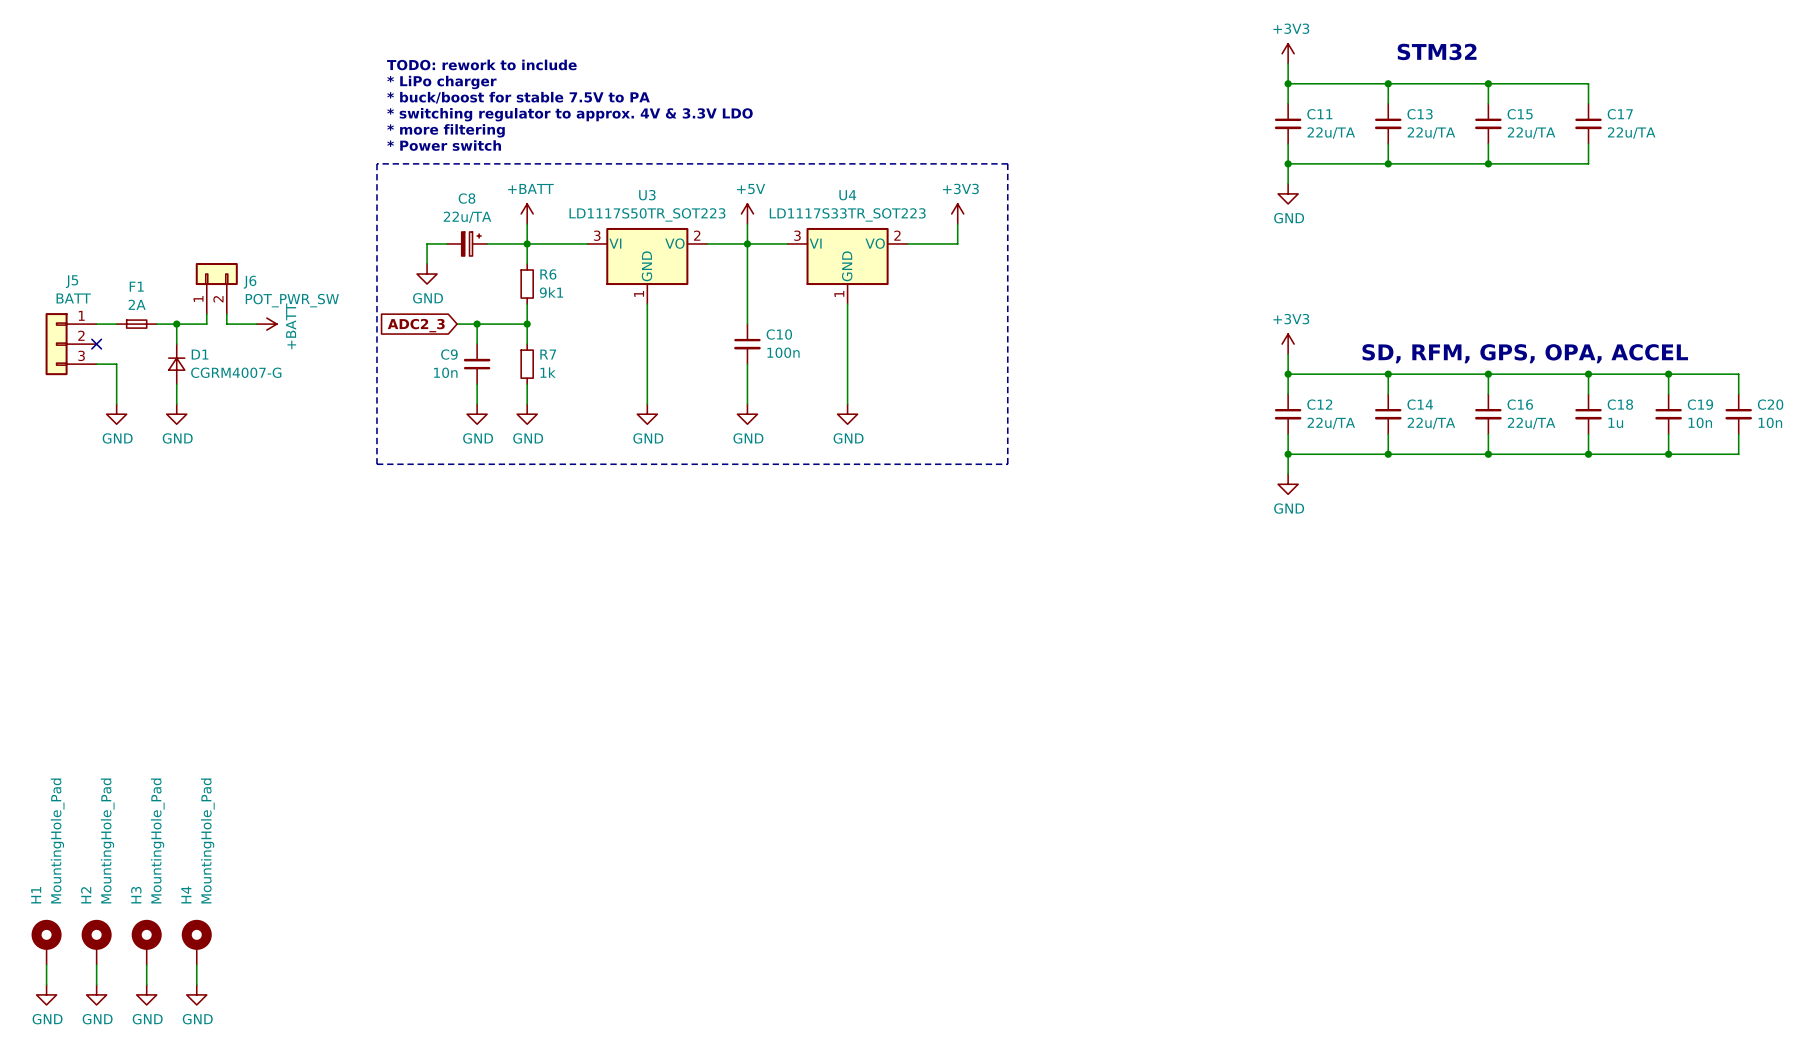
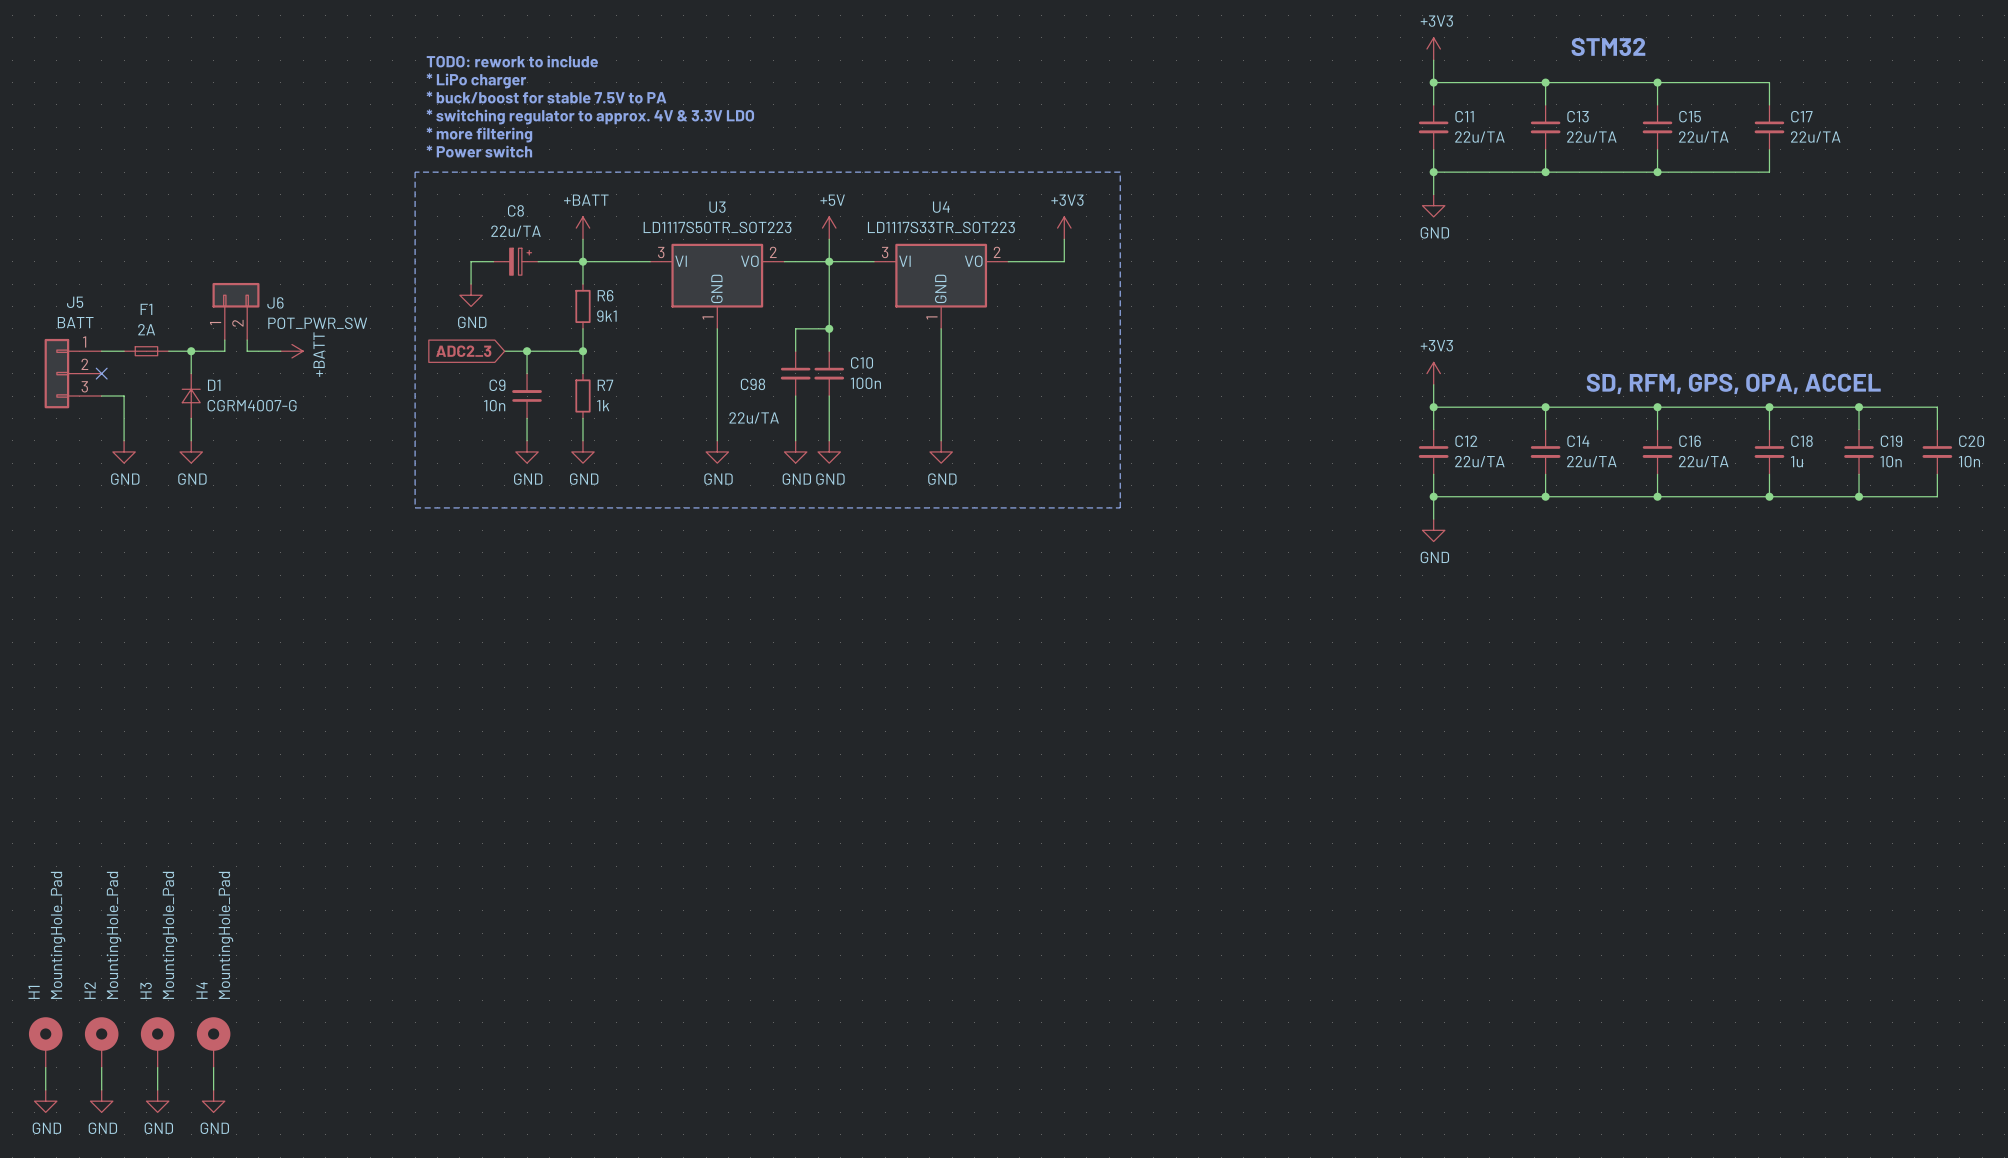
wire: none -> (829, 328) (795, 328) (795, 351)
junction: none -> (829, 328)
C98: none -> 22u/TA (795, 373)
wire: none -> (795, 396) (795, 440)
power symbol: none -> GND (795, 451)

